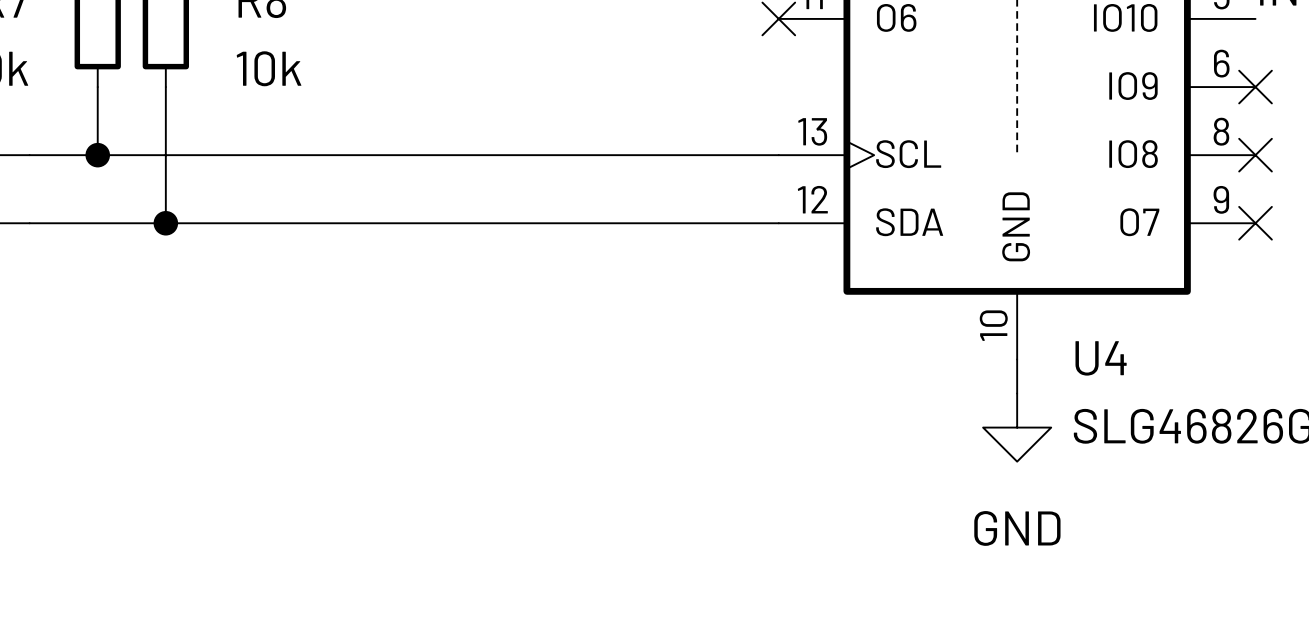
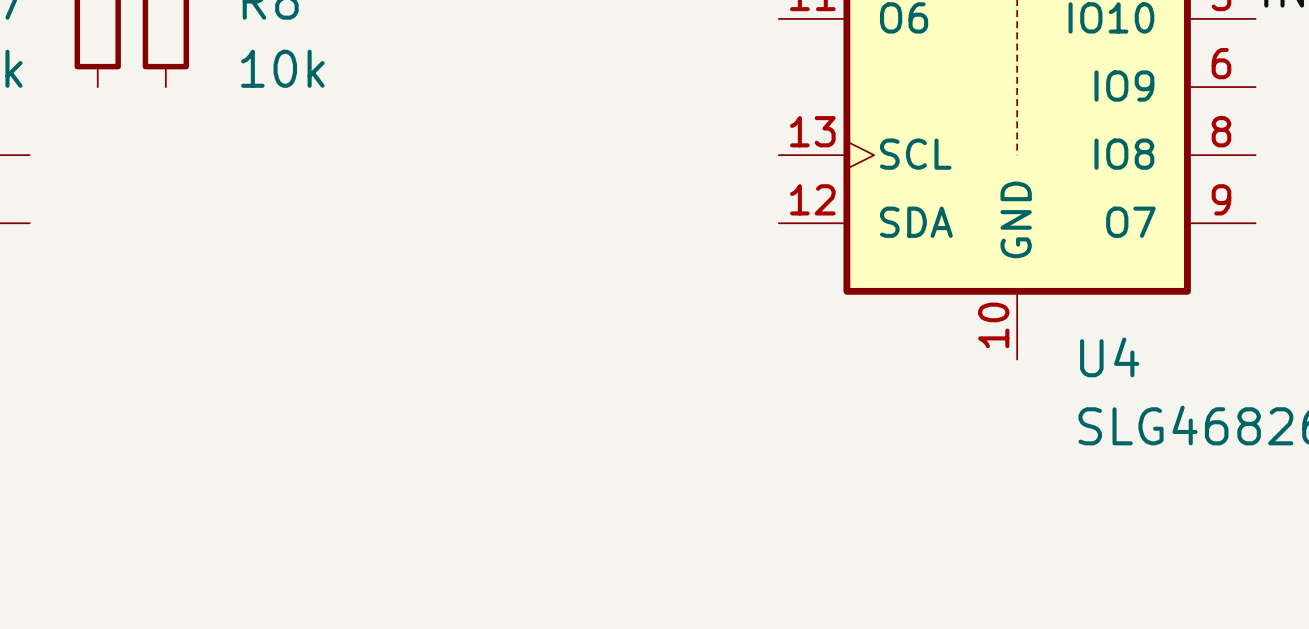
no-connect mark: (778, 18) -> none
wire: (97, 87) (97, 155) -> none
wire: (165, 87) (165, 223) -> none
no-connect mark: (1255, 87) -> none
wire: (29, 155) (778, 155) -> none
junction: (97, 155) -> none
no-connect mark: (1255, 155) -> none
wire: (29, 223) (778, 223) -> none
junction: (165, 223) -> none
no-connect mark: (1255, 223) -> none
wire: (1017, 359) (1017, 393) -> none
power symbol: GND (1017, 427) -> none

